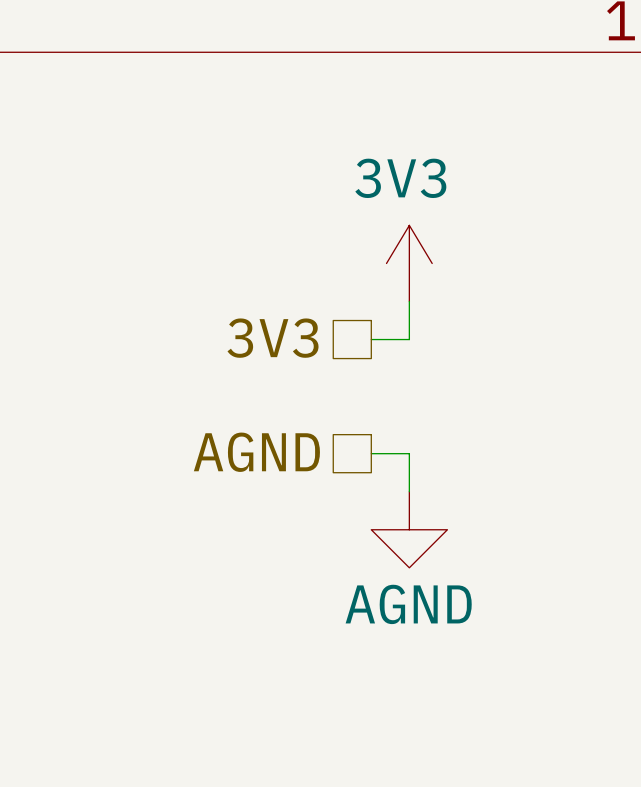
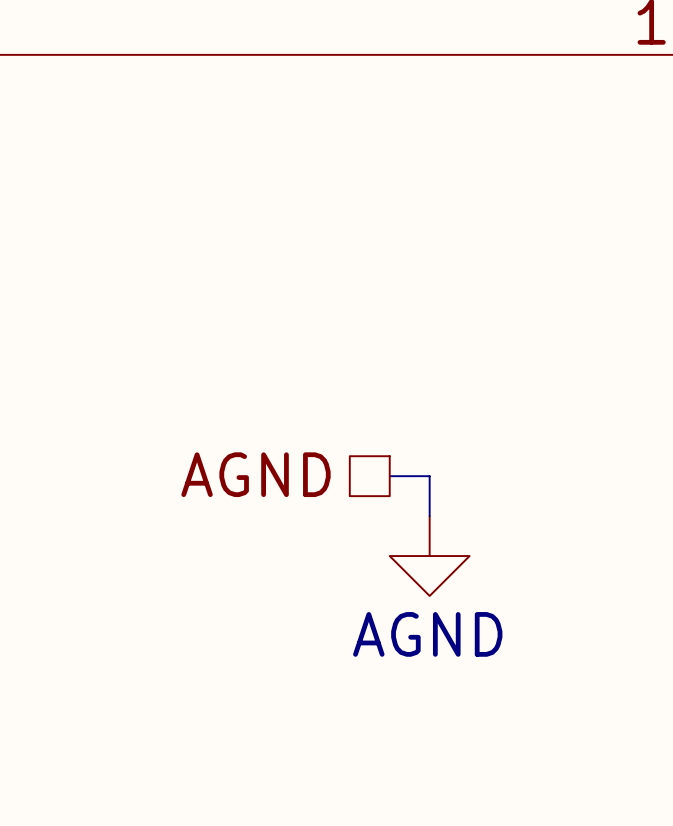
power symbol: 3V3 (409, 263) -> none
wire: (409, 301) (409, 339) (371, 339) -> none
hierarchical label: 3V3 (273, 338) -> none

